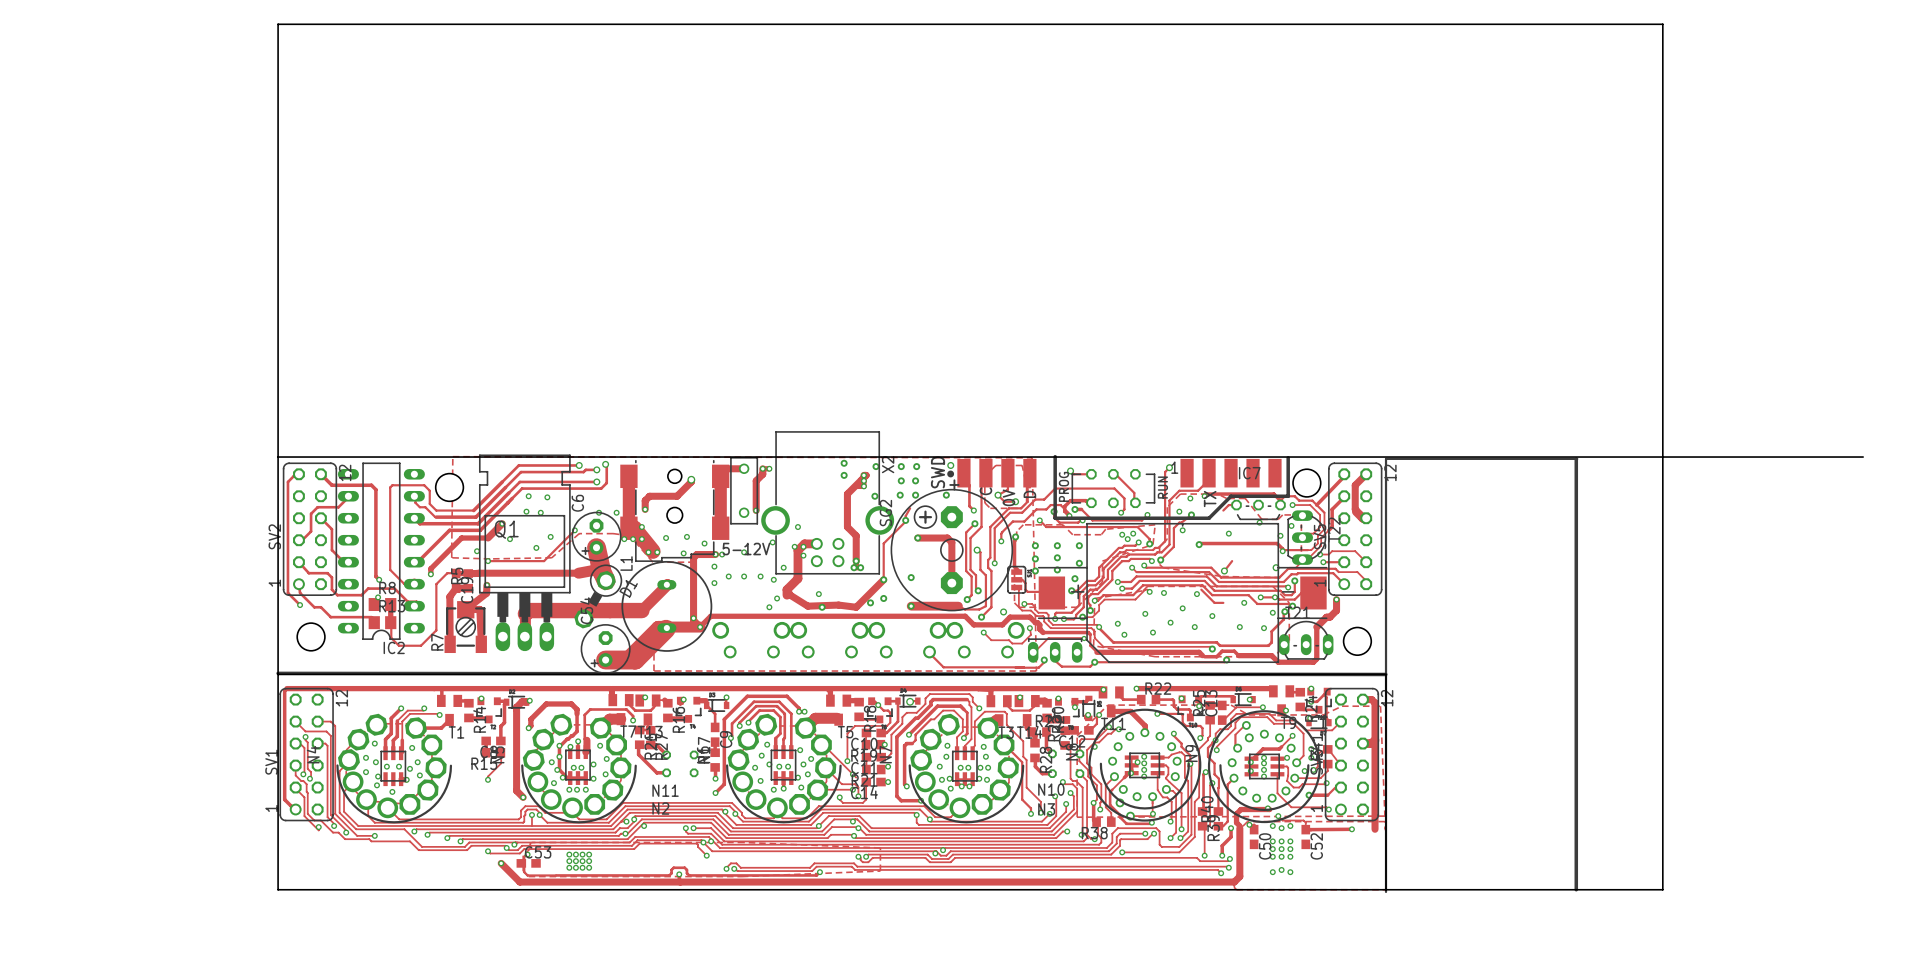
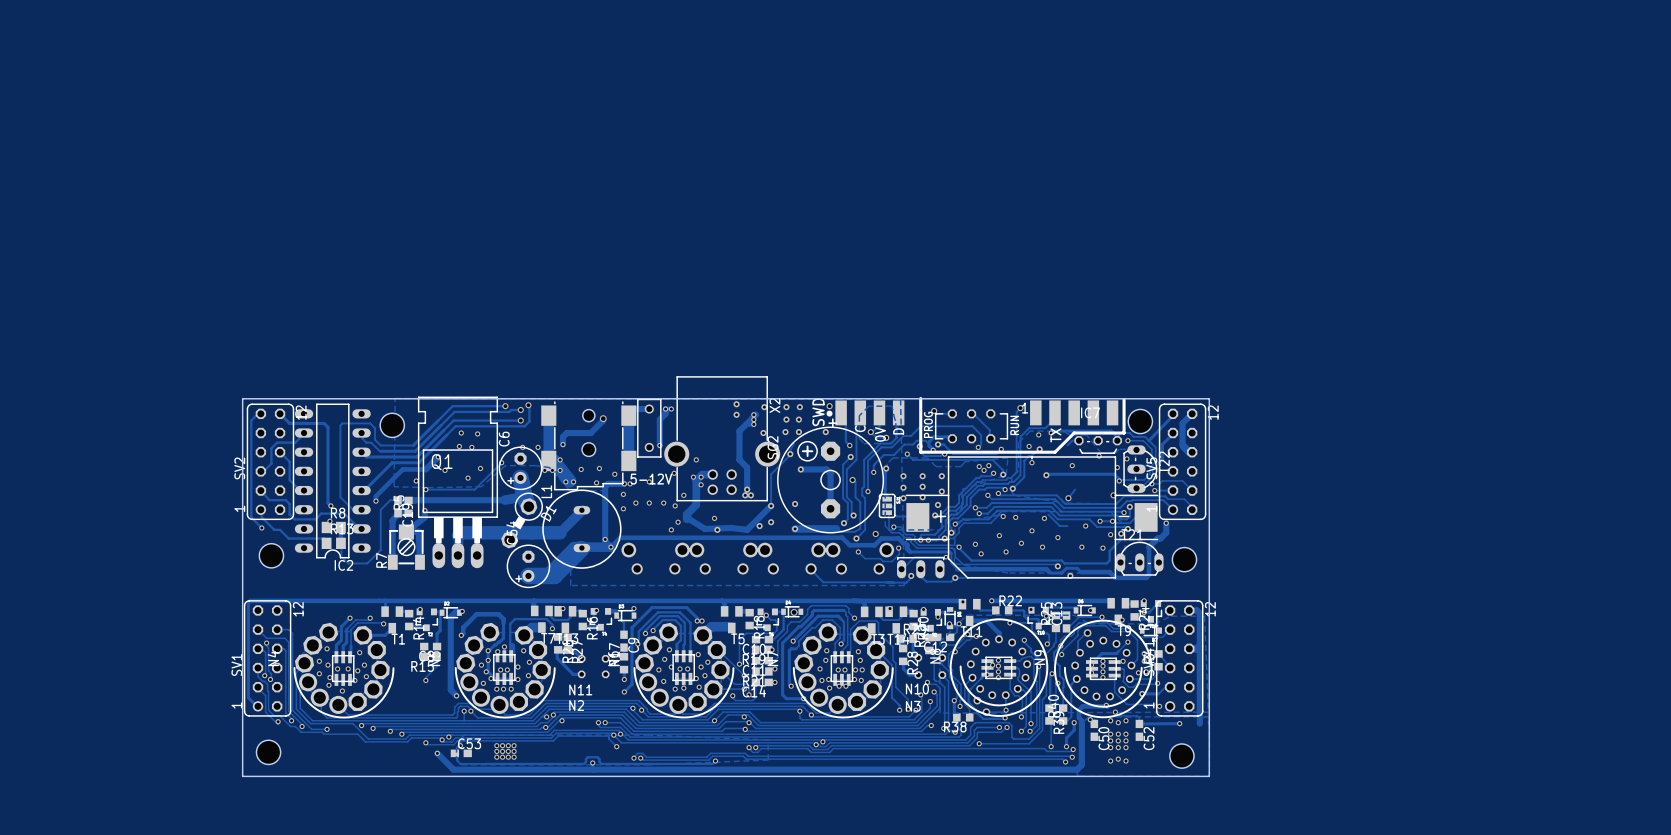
board edge: (278, 457) (278, 24) (1662, 24) (1662, 889) (1385, 889) -> none
board edge: (1385, 457) (1863, 457) -> (1209, 398) (1209, 776)
line: (1577, 458) (1386, 458) (1386, 891) -> none
line: (1576, 459) (1576, 889) -> none
line: (278, 673) (1385, 674) -> none
board edge: (278, 674) (1386, 674) (1386, 889) -> none
hole: none -> (268, 752)
hole: none -> (1181, 756)

